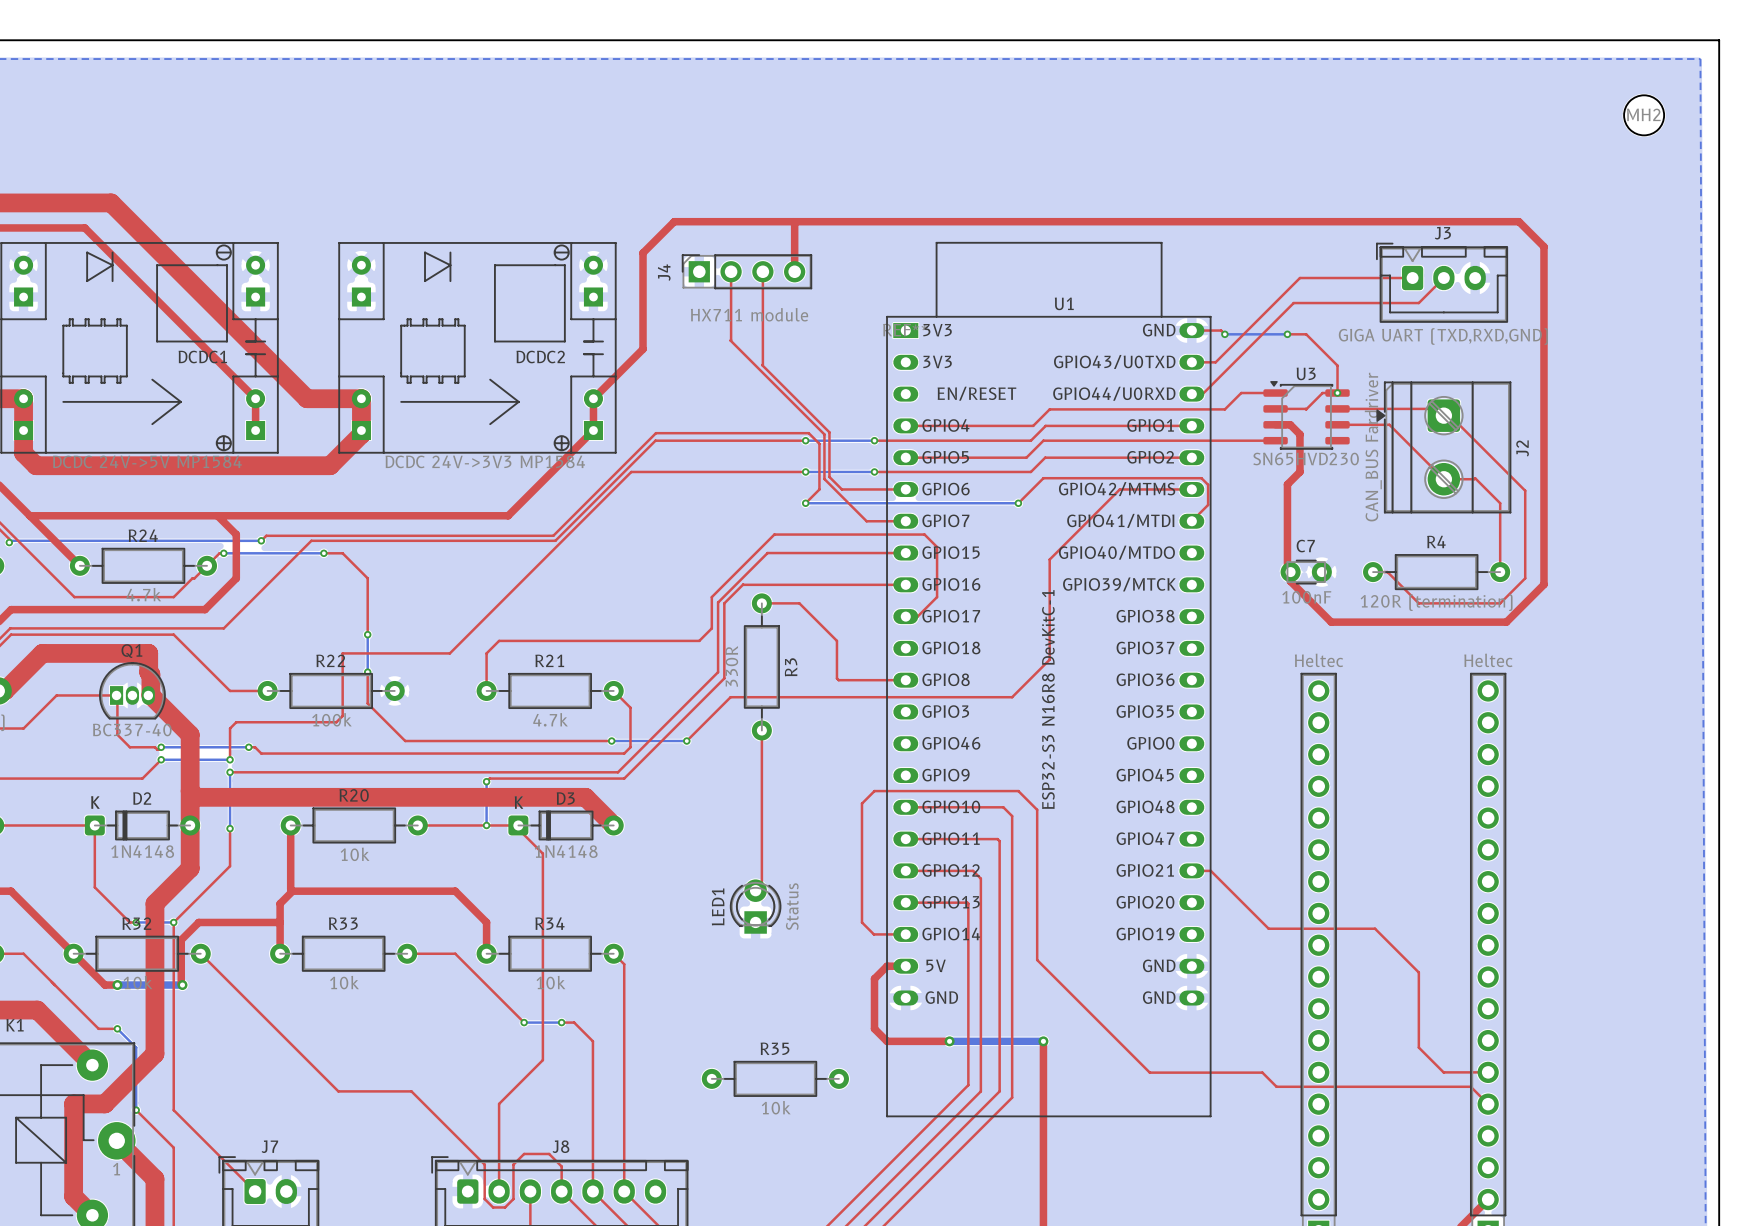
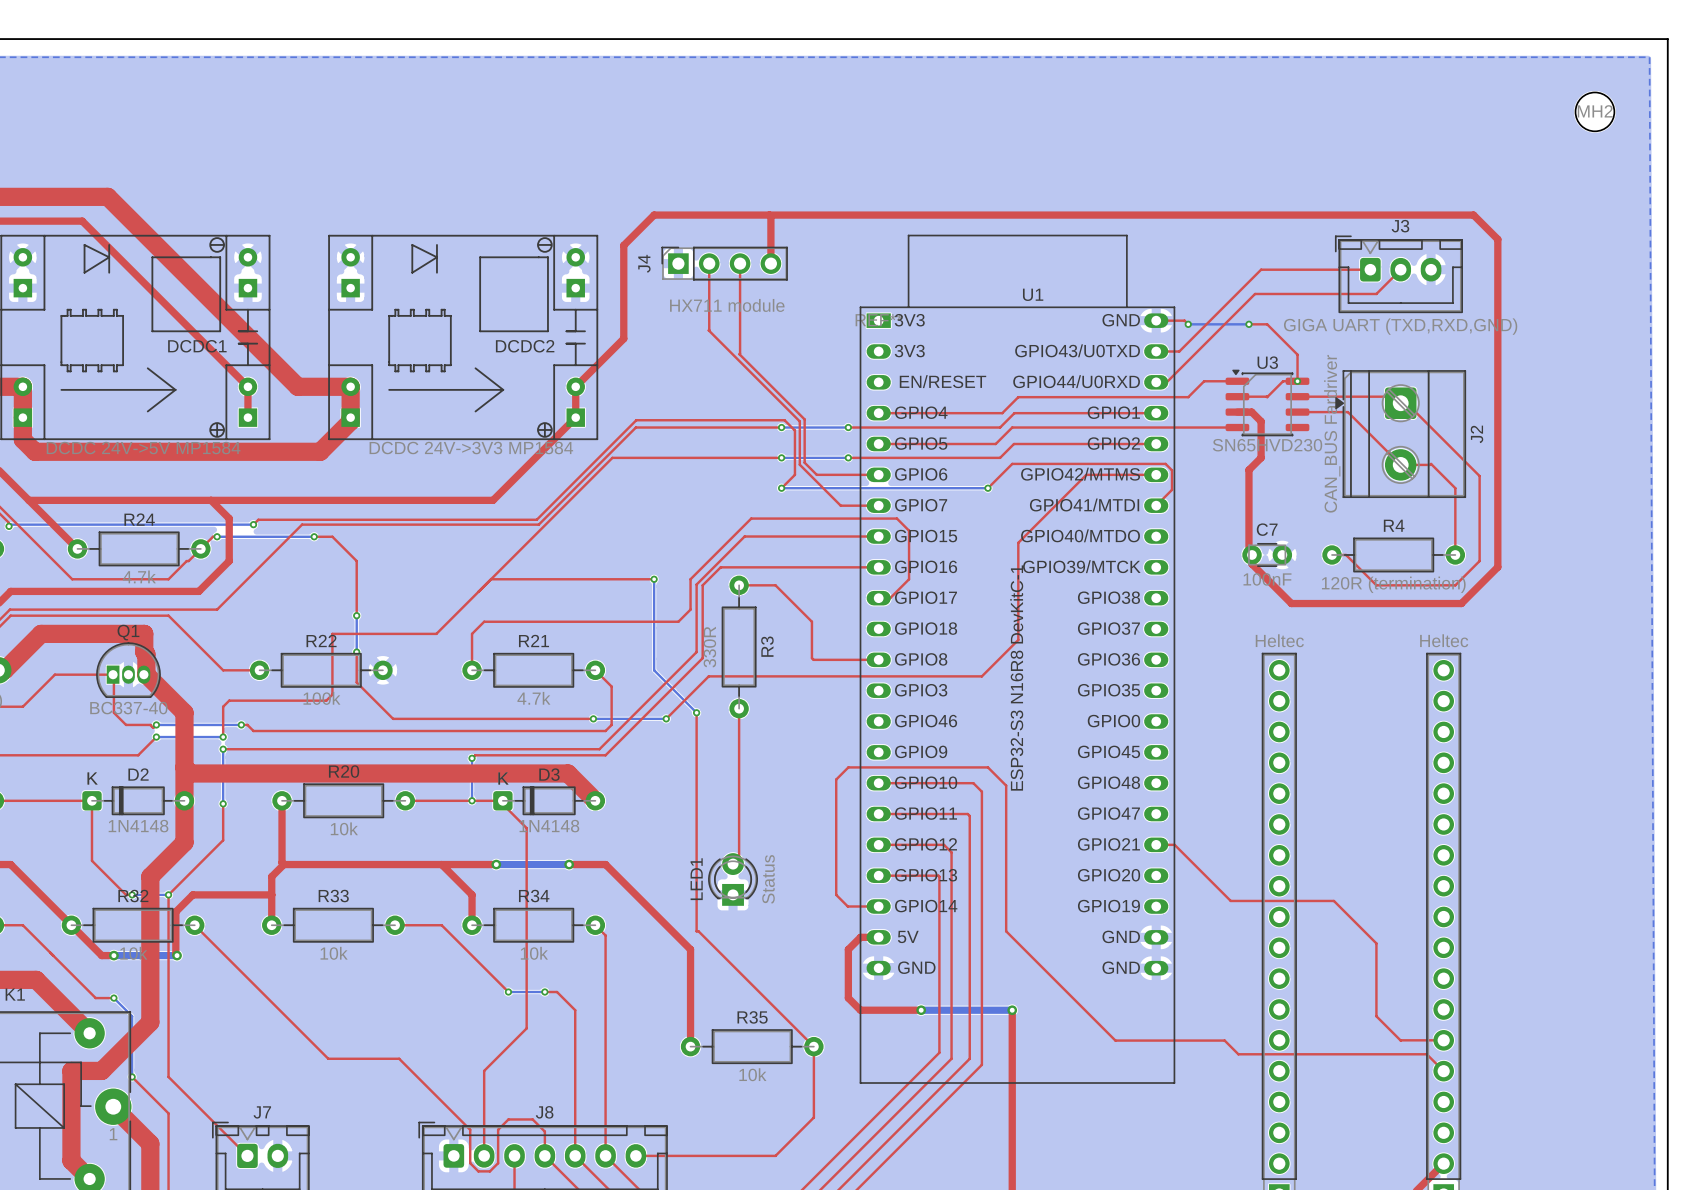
top track: none -> (491, 579) (654, 579)
bottom track: none -> (654, 579) (654, 670) (696, 712)
via: none -> (654, 579)
top track: none -> (696, 712) (696, 931) (813, 1046) (813, 1117) (775, 1155) (635, 1155)
via: none -> (696, 712)
top track: none -> (441, 864) (496, 864)
bottom track: none -> (496, 864) (569, 864)
via: none -> (496, 864)
top track: none -> (569, 864) (605, 864) (690, 949) (690, 1046)
via: none -> (569, 864)

